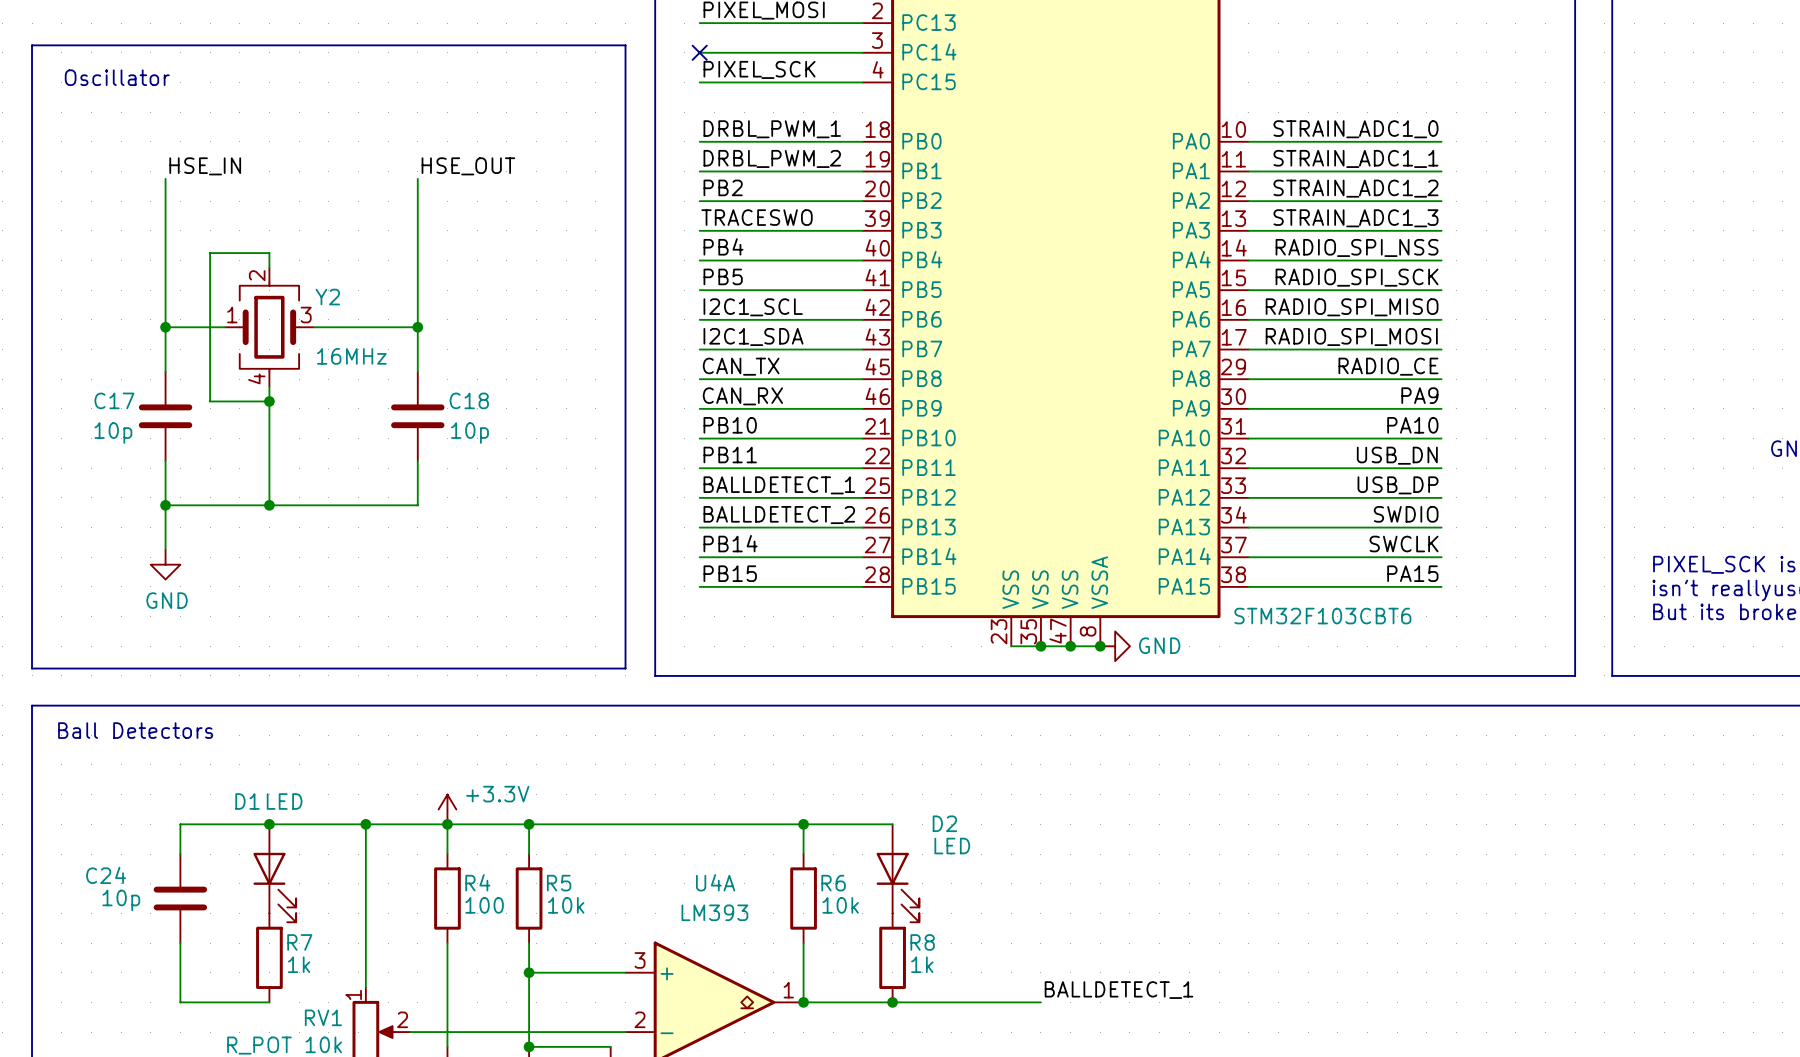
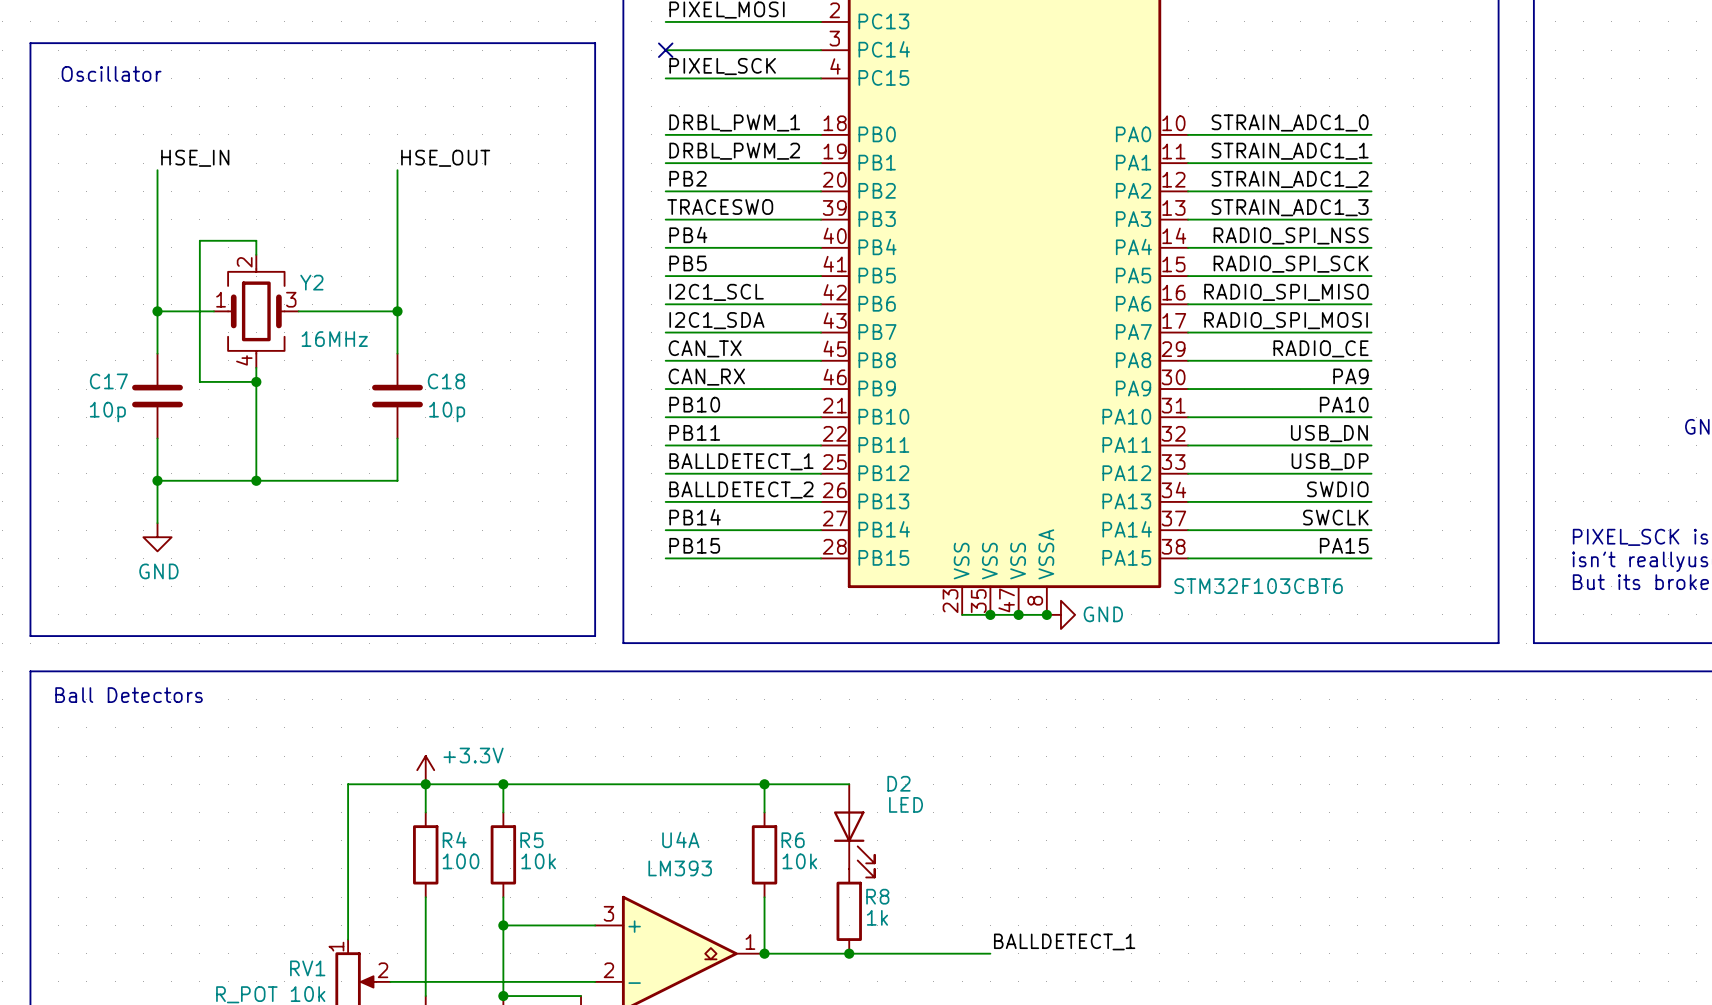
junction: (269, 824) -> none
wire: (365, 824) (180, 824) (180, 854) -> none
junction: (365, 824) -> none
D1: LED (274, 873) -> none
C24: 10p (180, 898) -> none
wire: (180, 943) (180, 1002) (269, 1002) -> none
R7: 1k (269, 957) -> none

